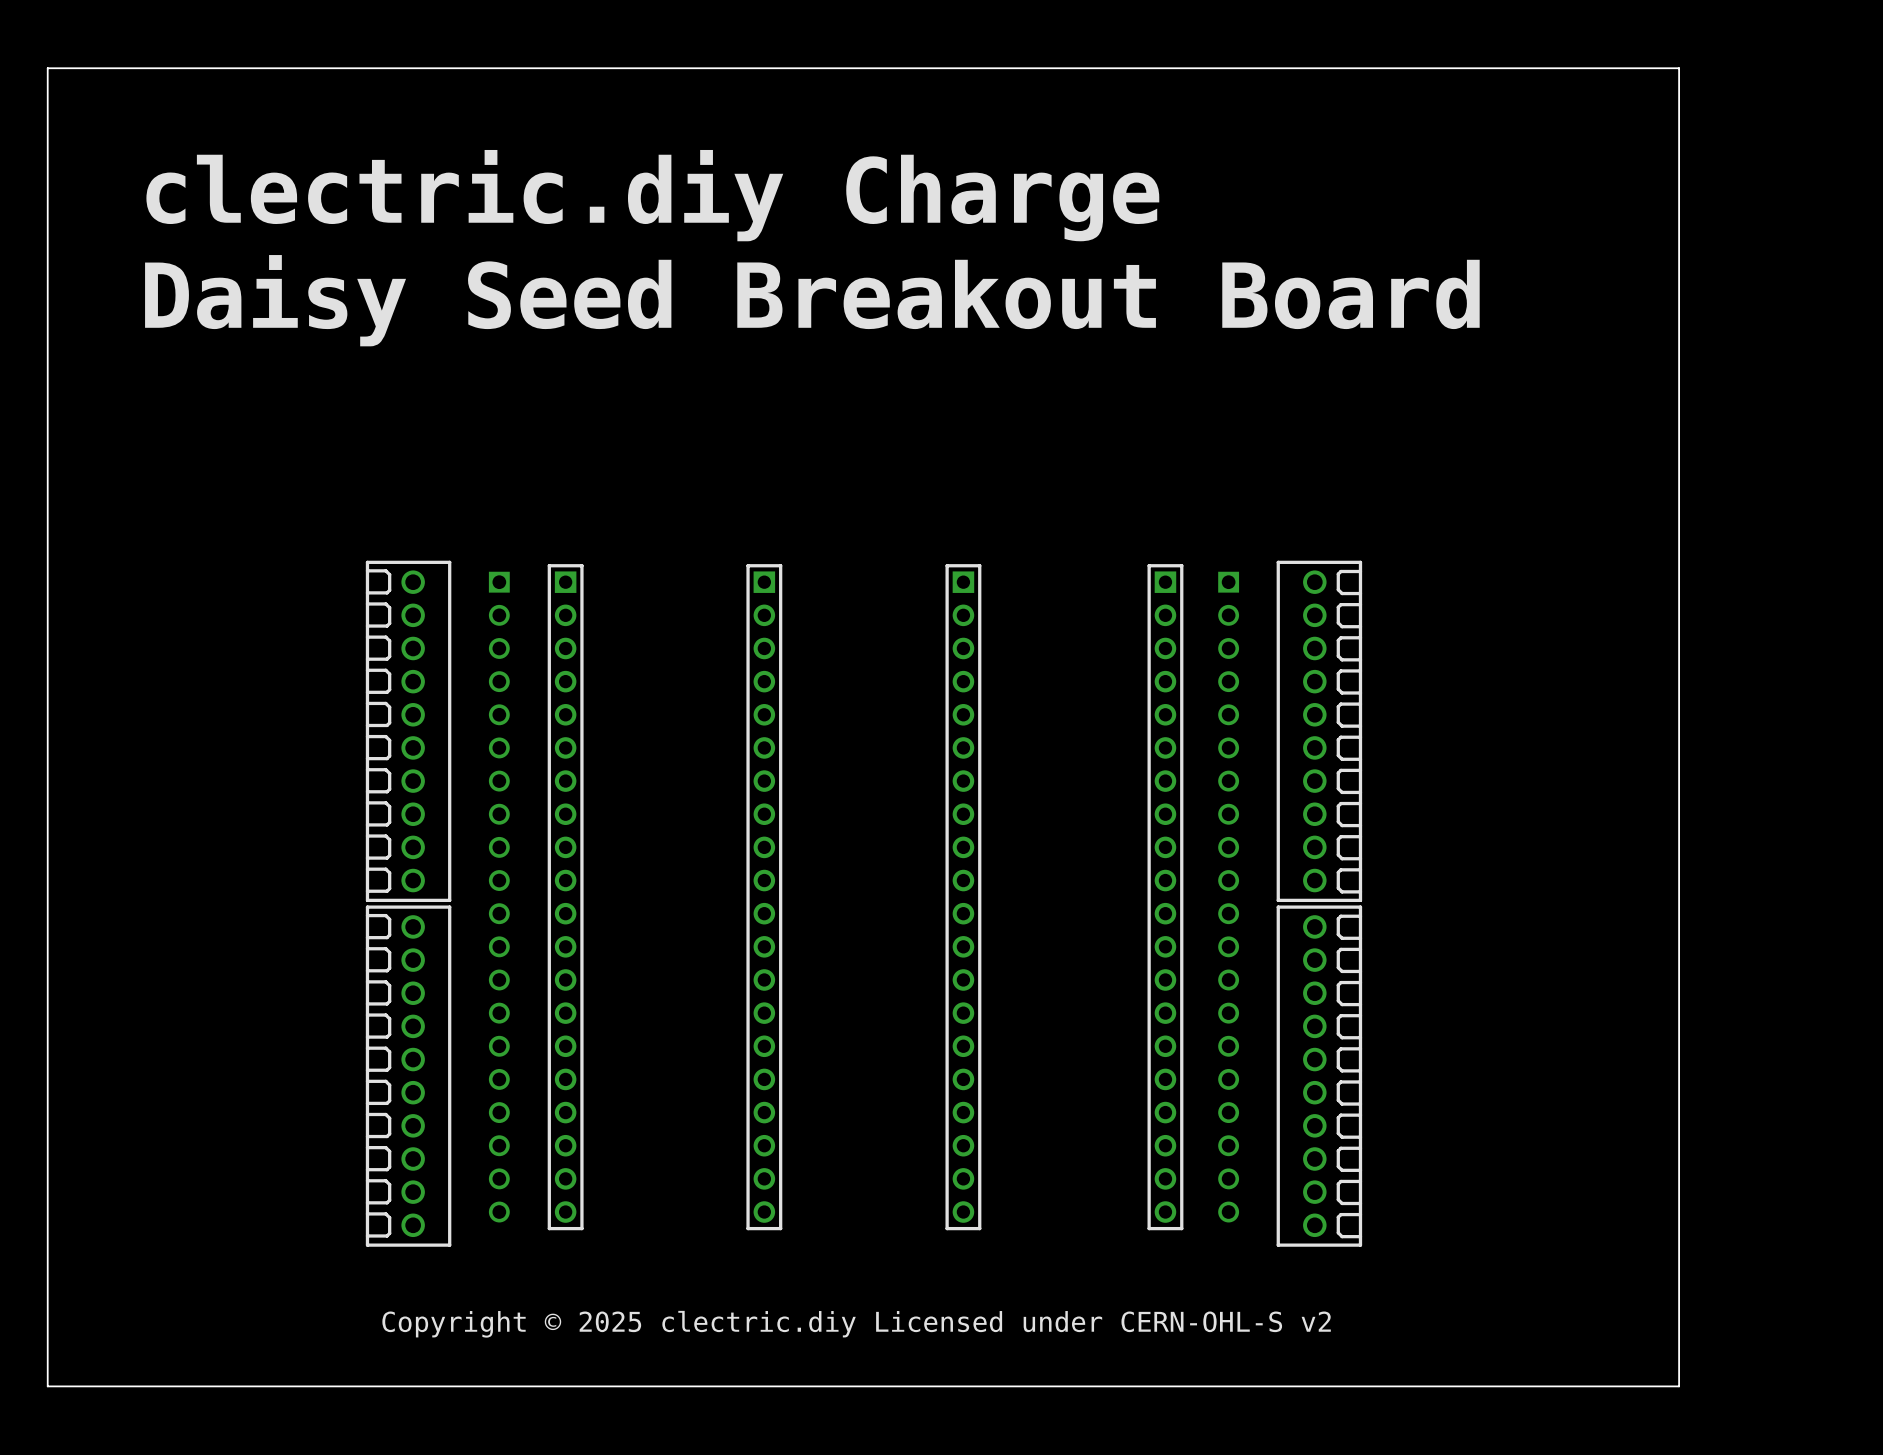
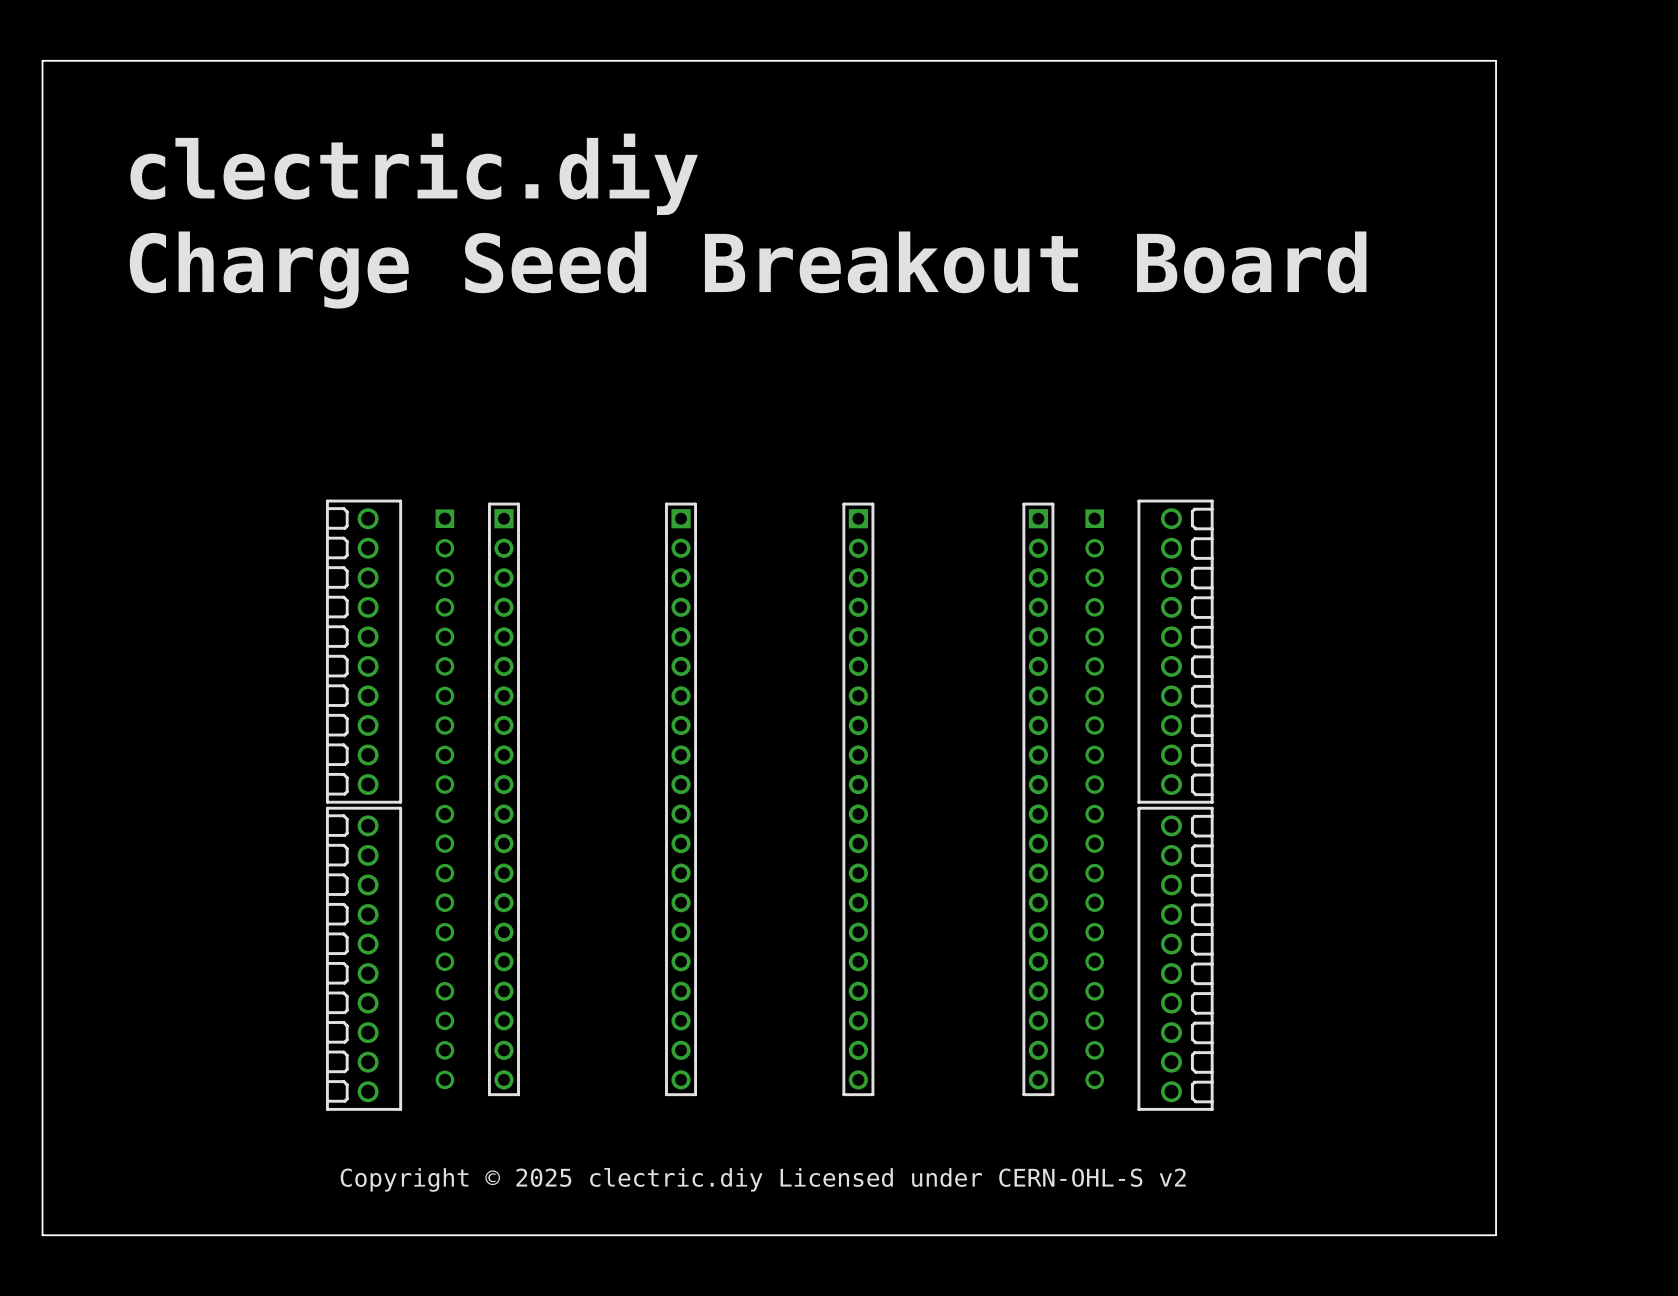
text: clectric.diy Charge (652, 195) -> clectric.diy (414, 174)
text: Daisy Seed Breakout Board (812, 300) -> Charge Seed Breakout Board (748, 270)

